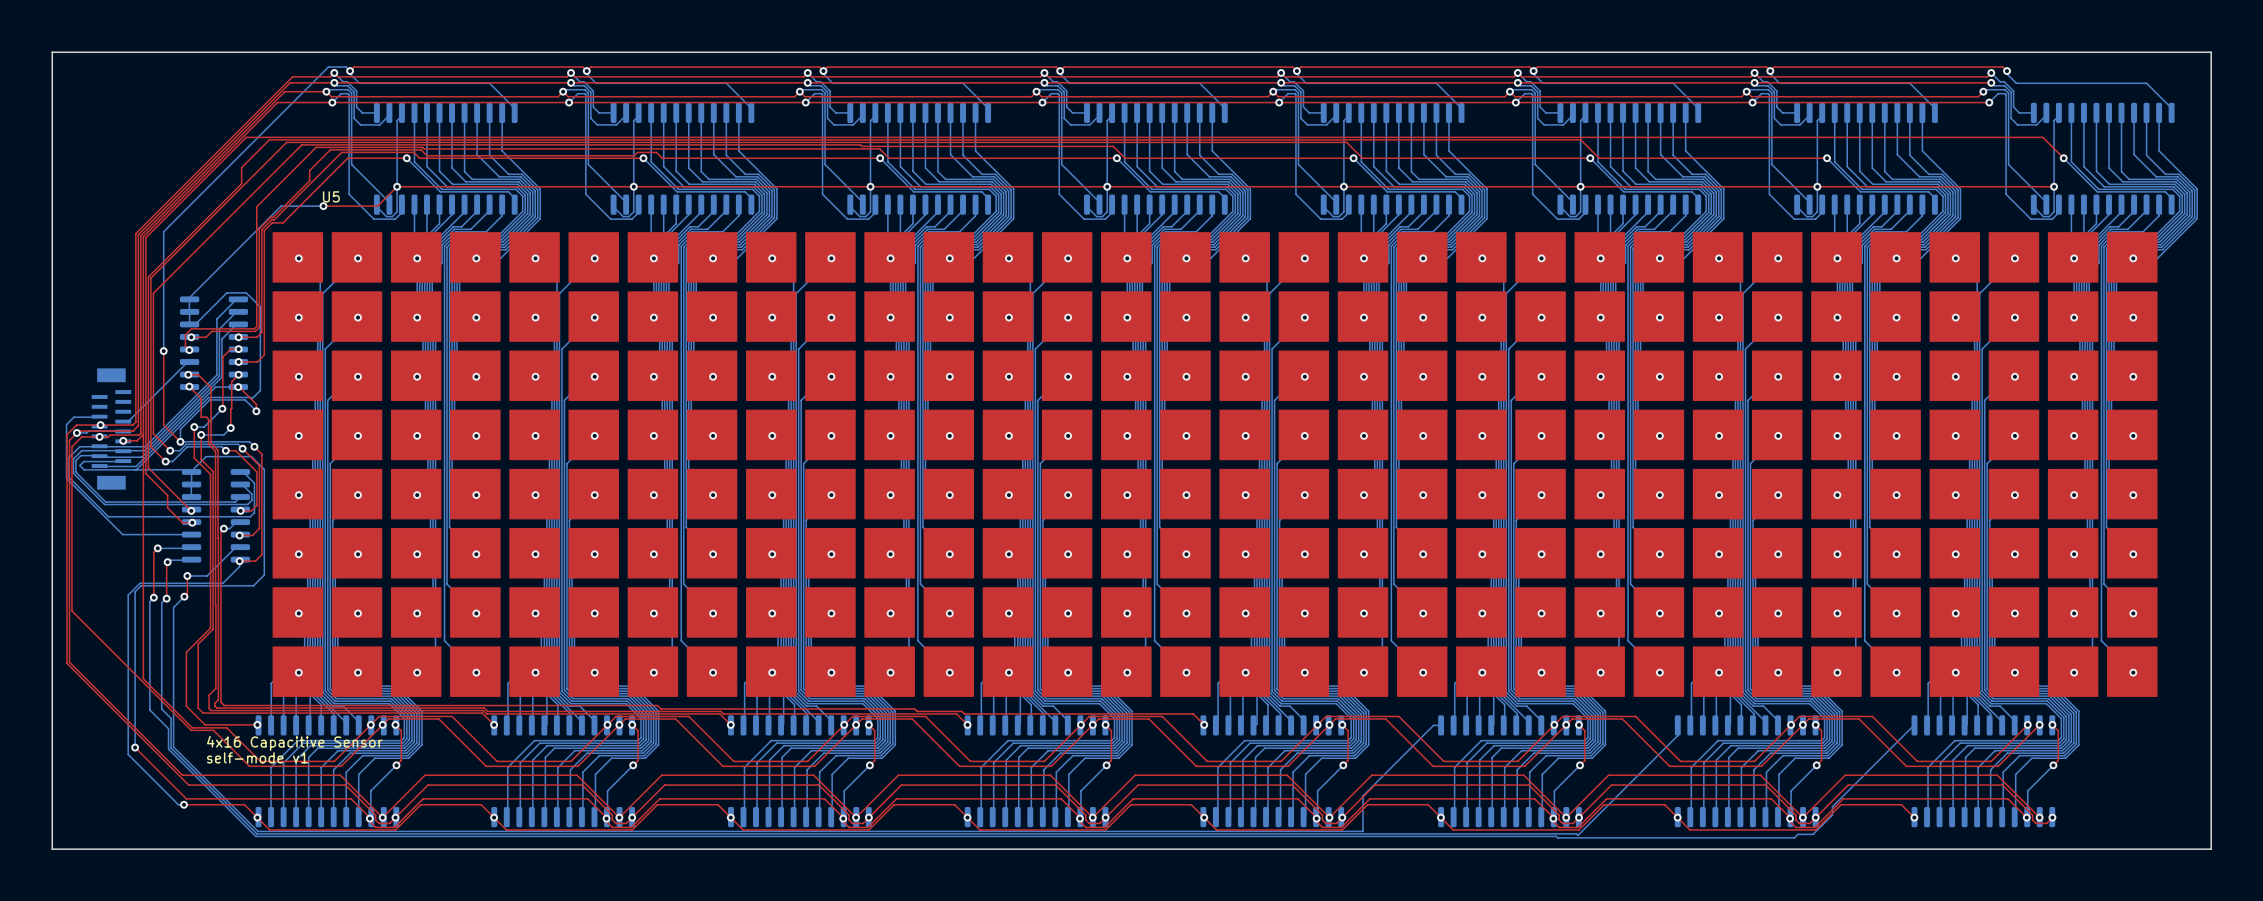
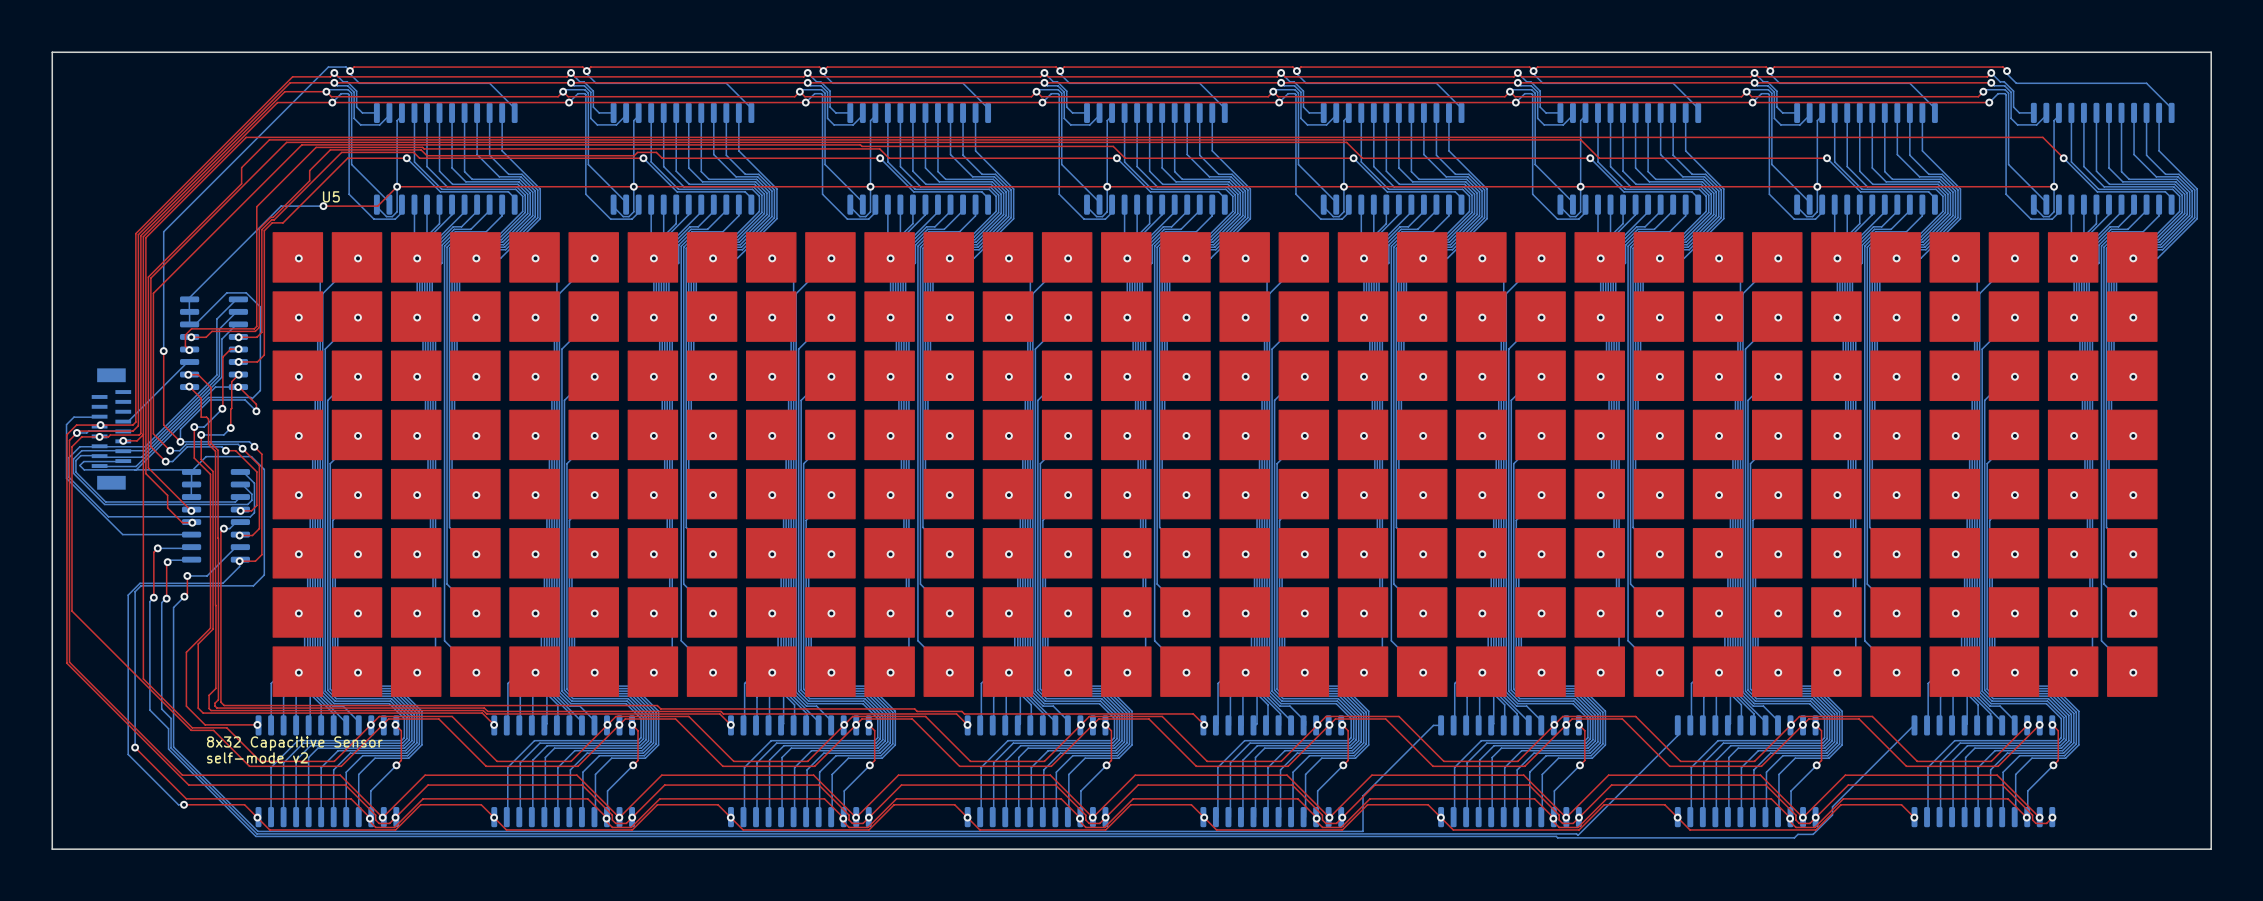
text: 4x16 Capacitive Sensor (294, 743) -> 8x32 Capacitive Sensor (294, 743)
text: self-mode v1 (257, 757) -> self-mode v2 (257, 757)

